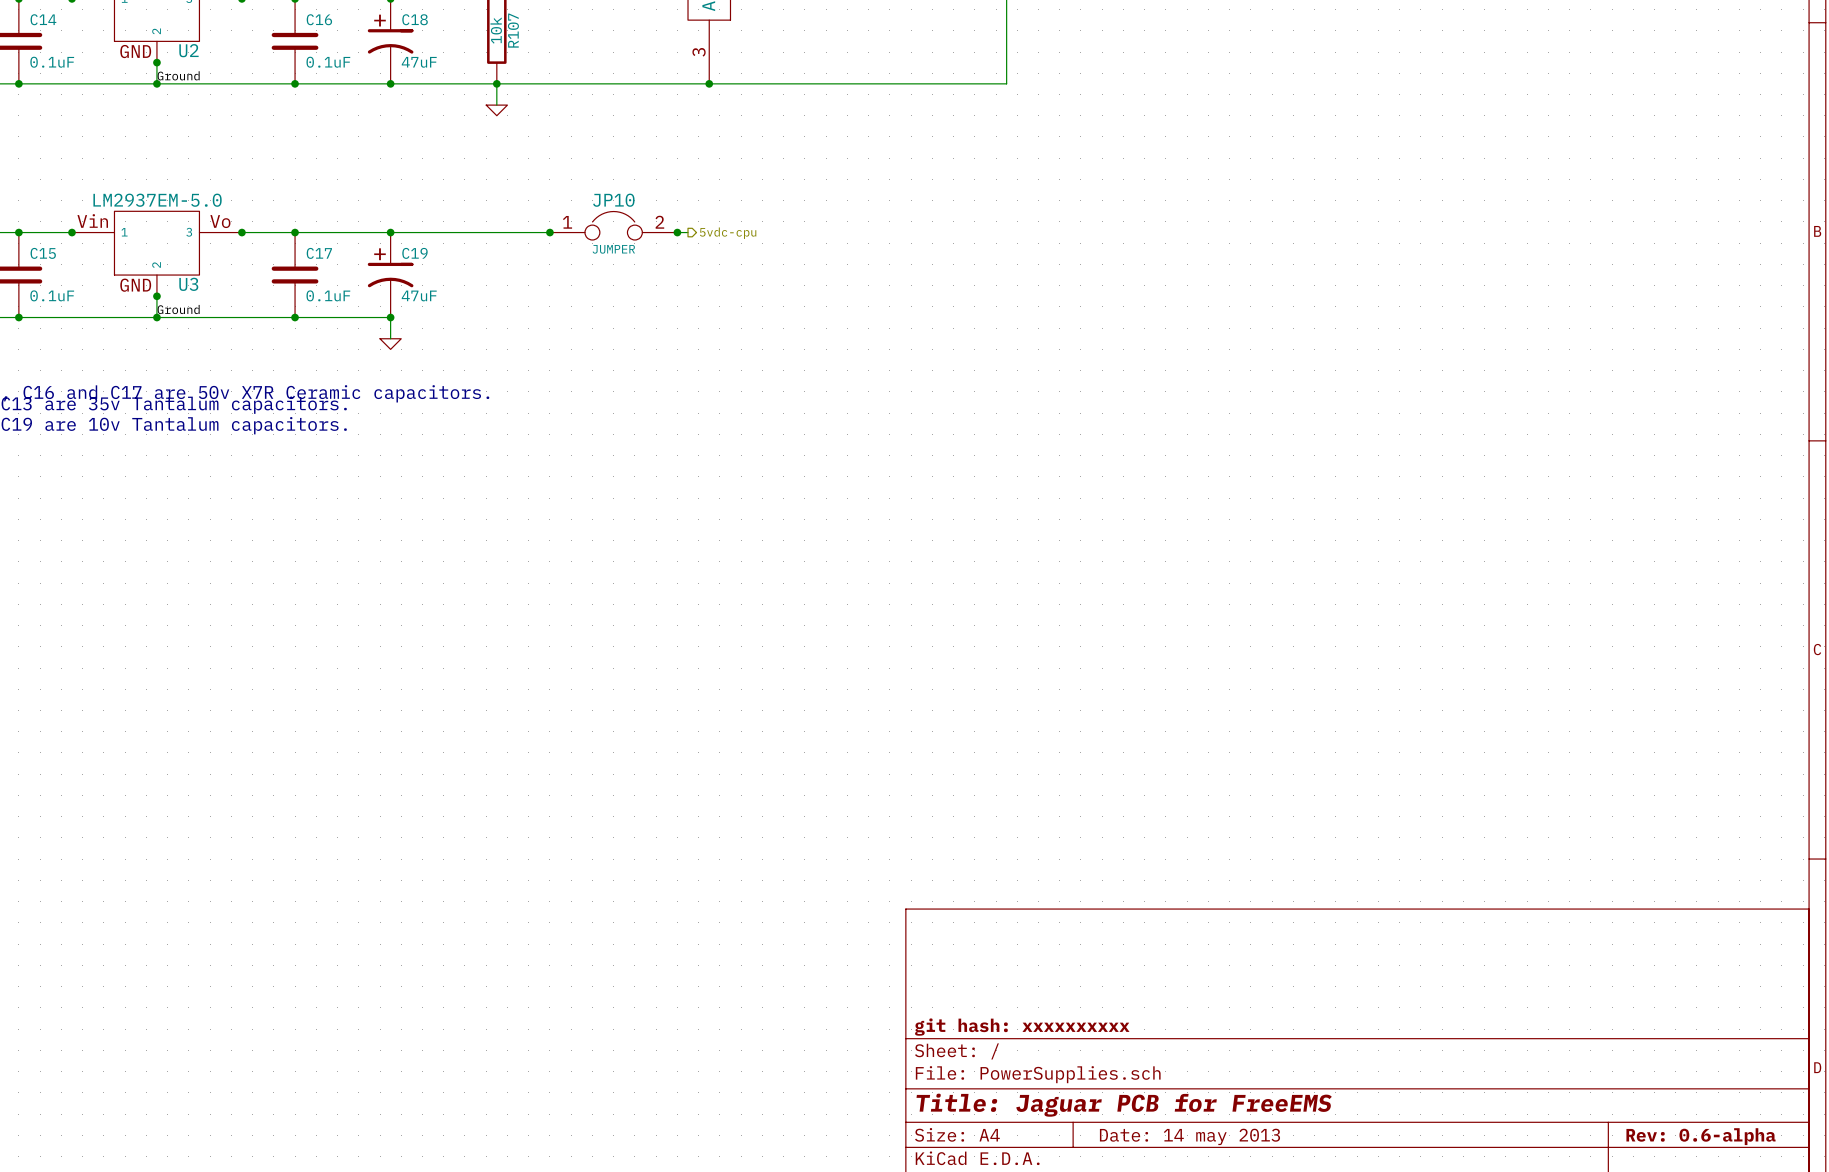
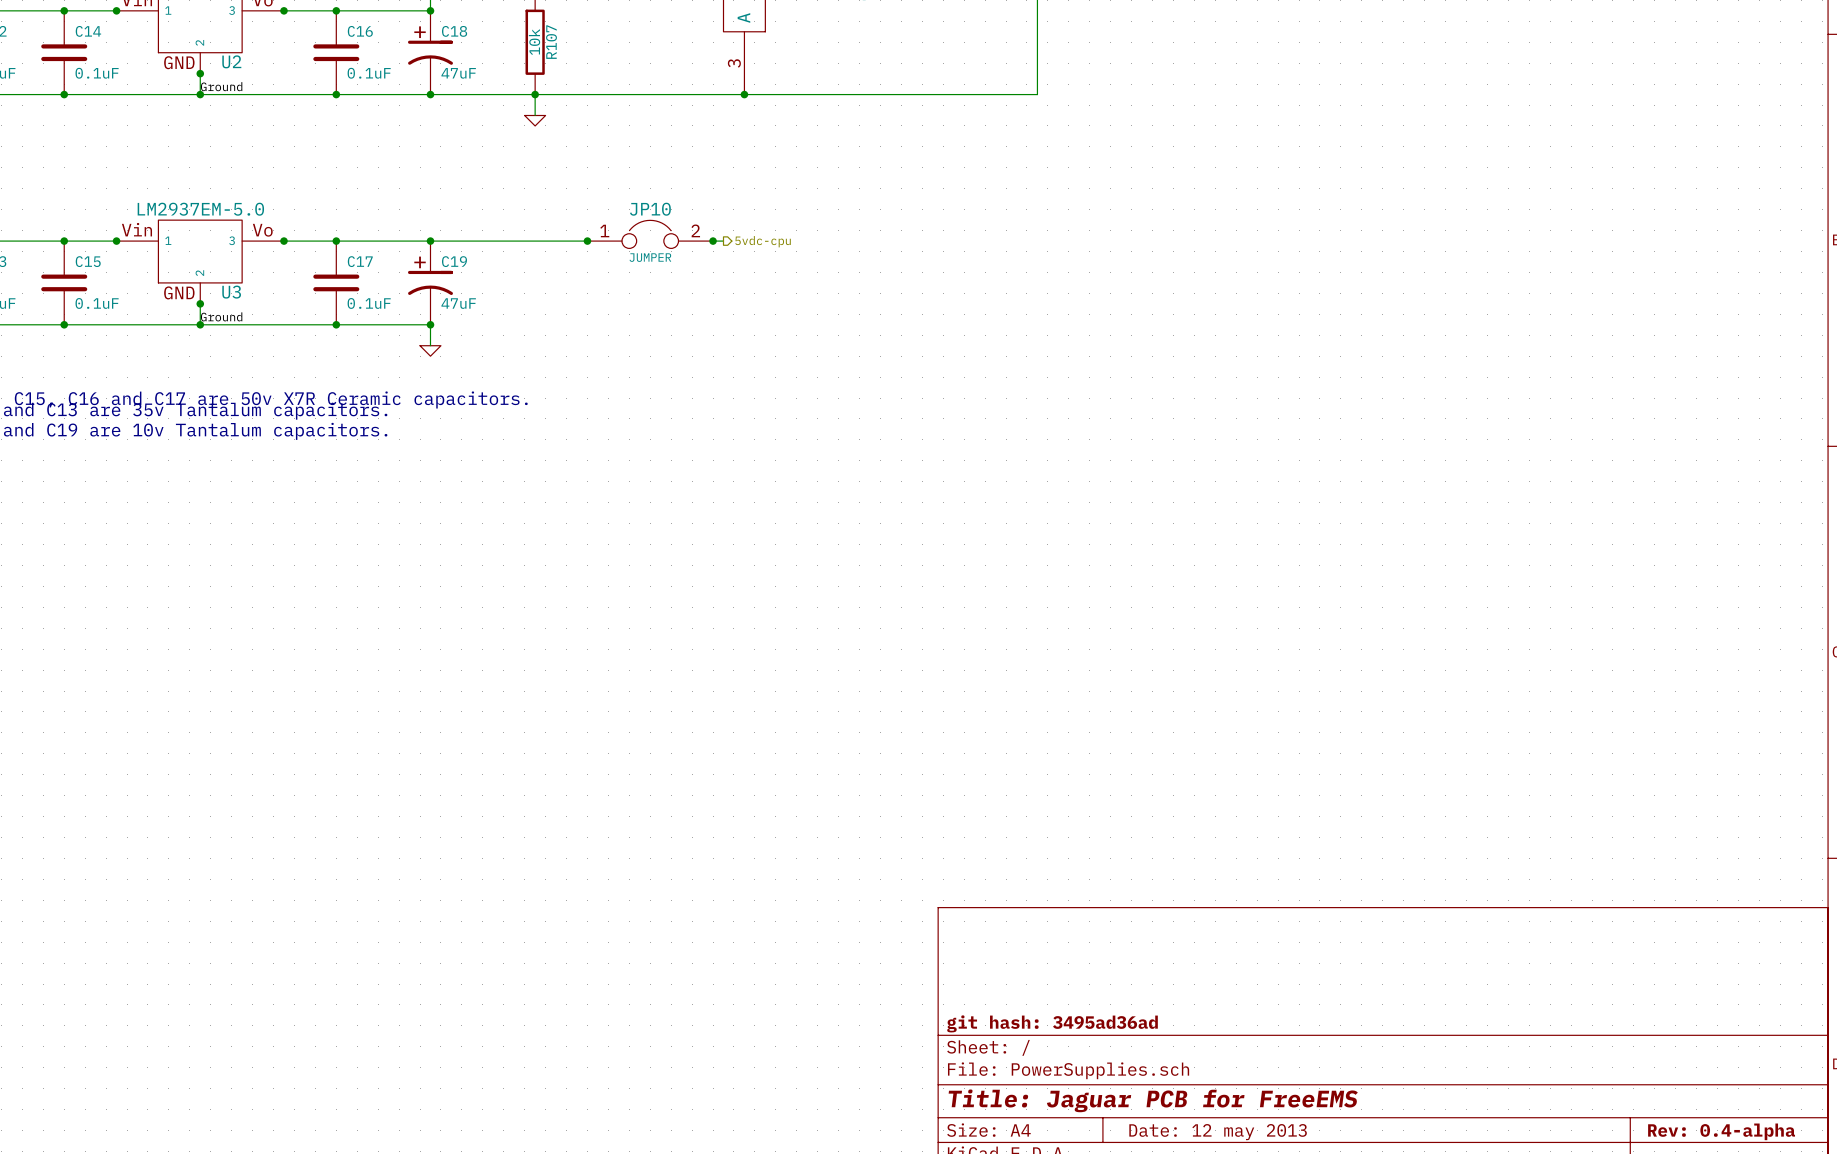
title block: git hash: xxxxxxxxxx (1022, 1027) -> git hash: 3495ad36ad (1052, 1023)
title block: Date: 14 may 2013 (1189, 1136) -> Date: 12 may 2013 (1218, 1132)
title block: Rev: 0.6-alpha (1700, 1136) -> Rev: 0.4-alpha (1721, 1131)

